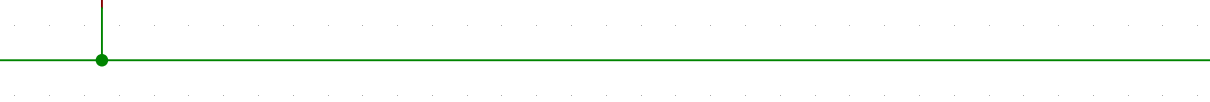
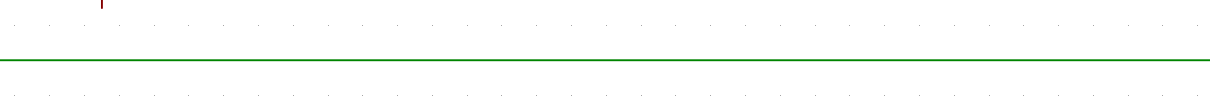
wire: (101, 8) (101, 60) -> none
junction: (101, 60) -> none

